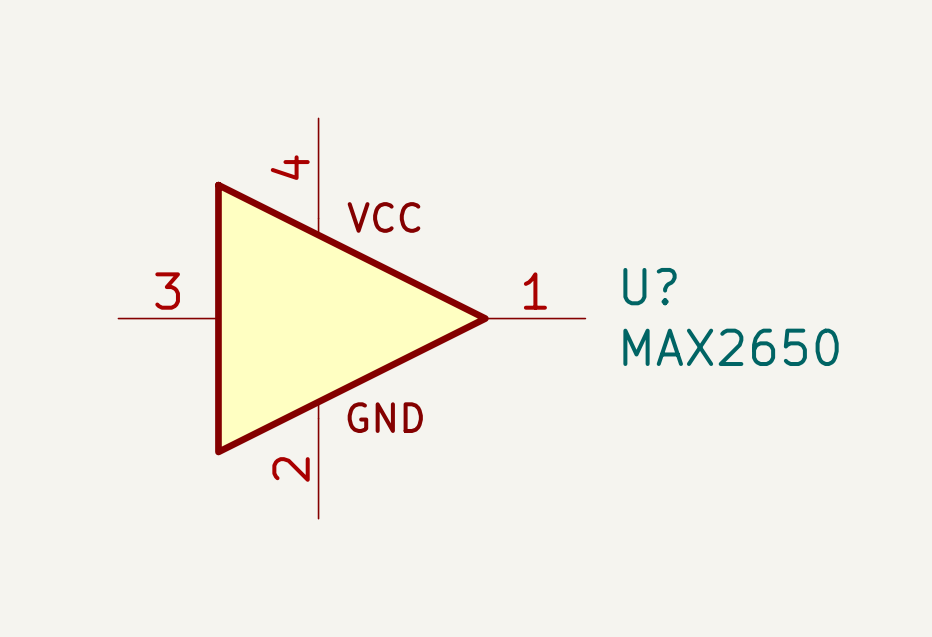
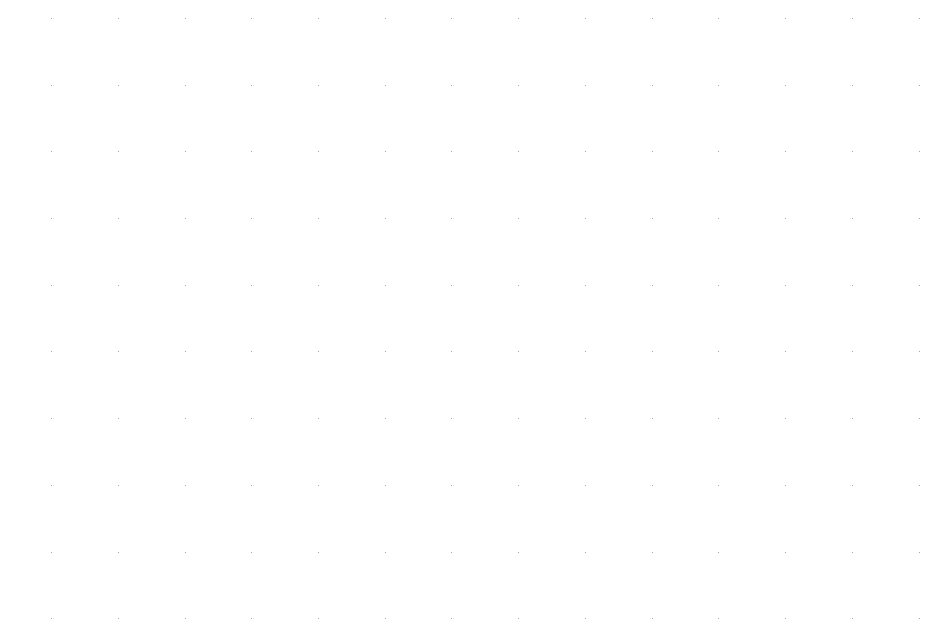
U?: MAX2650 (351, 318) -> none

